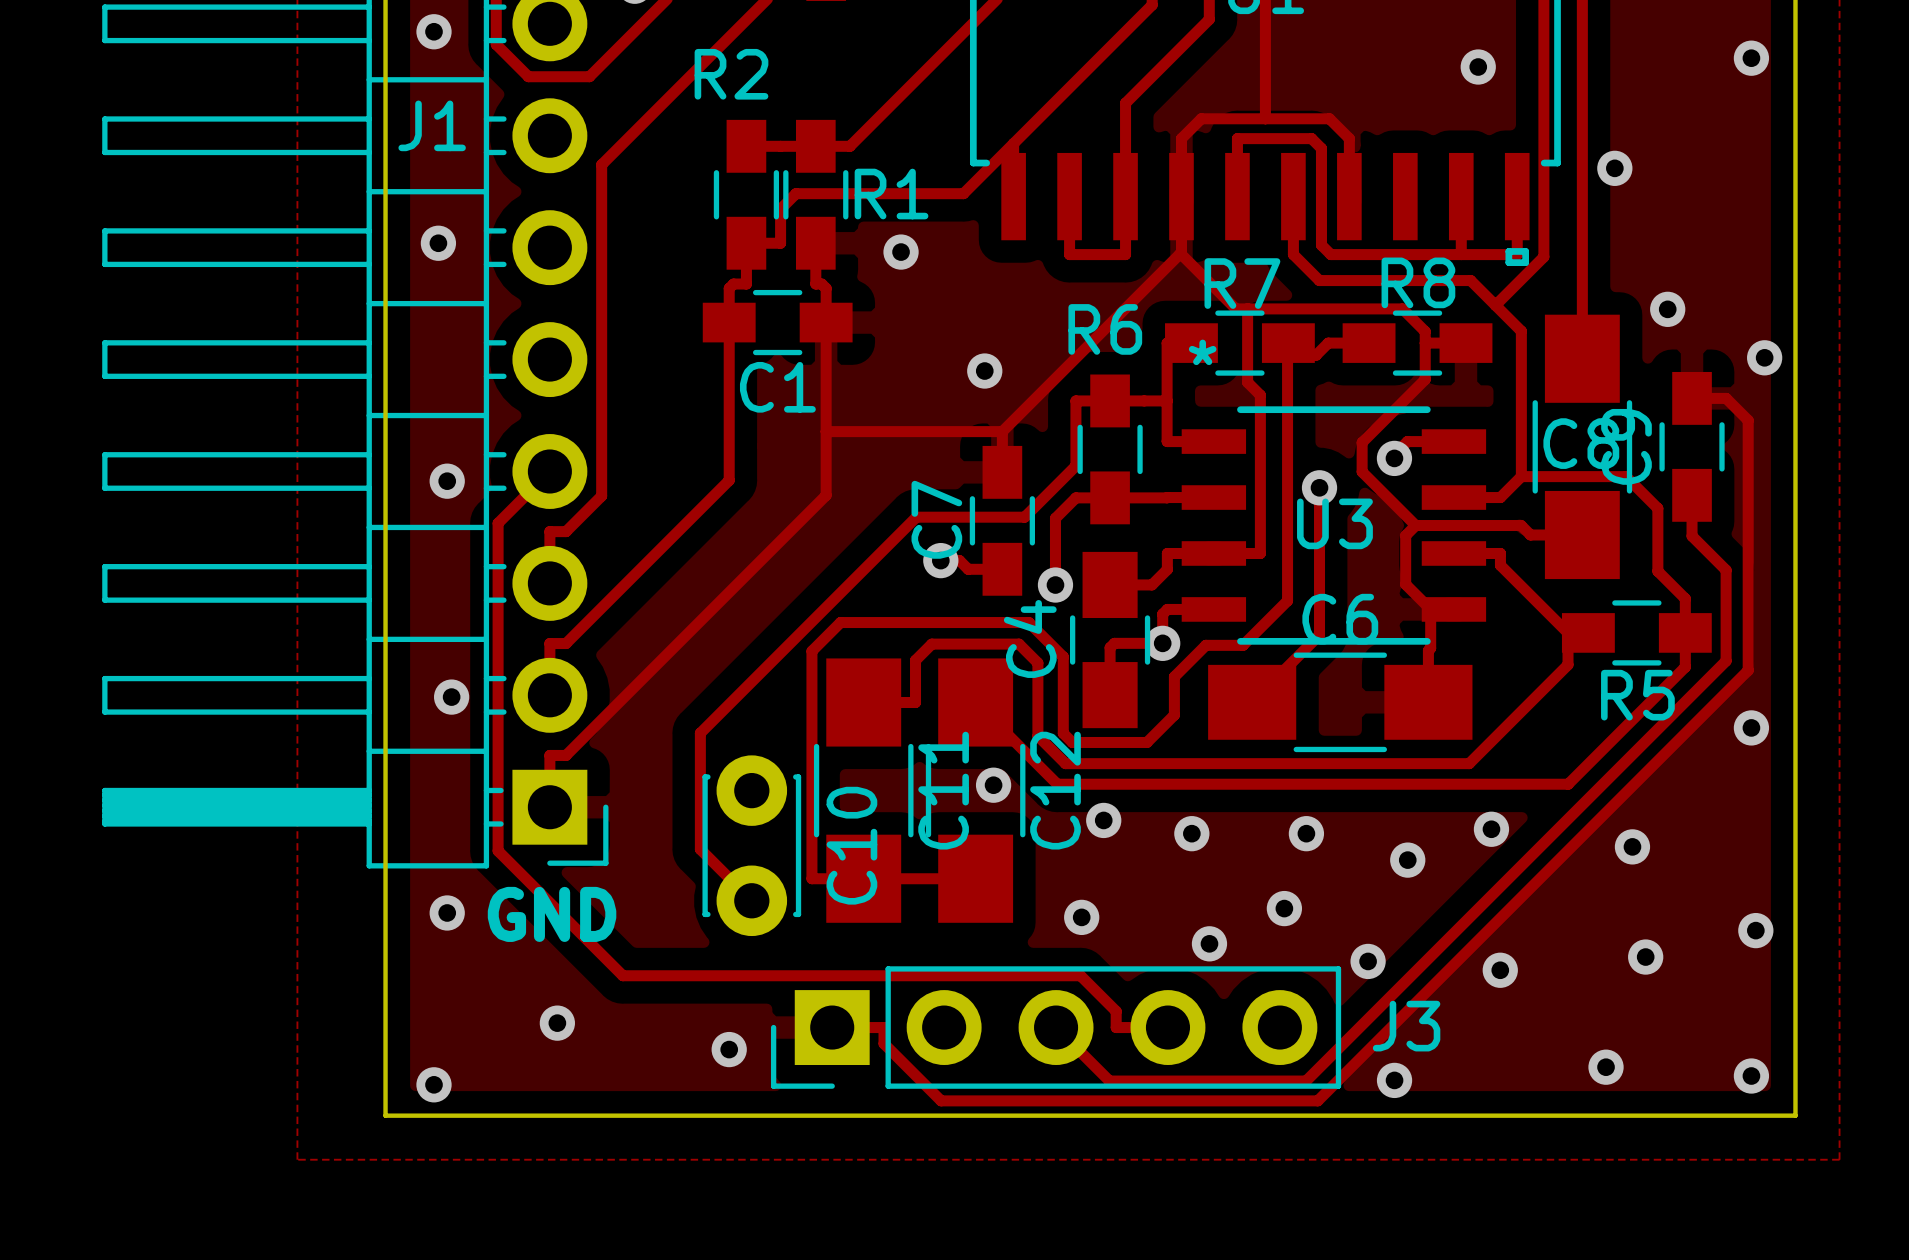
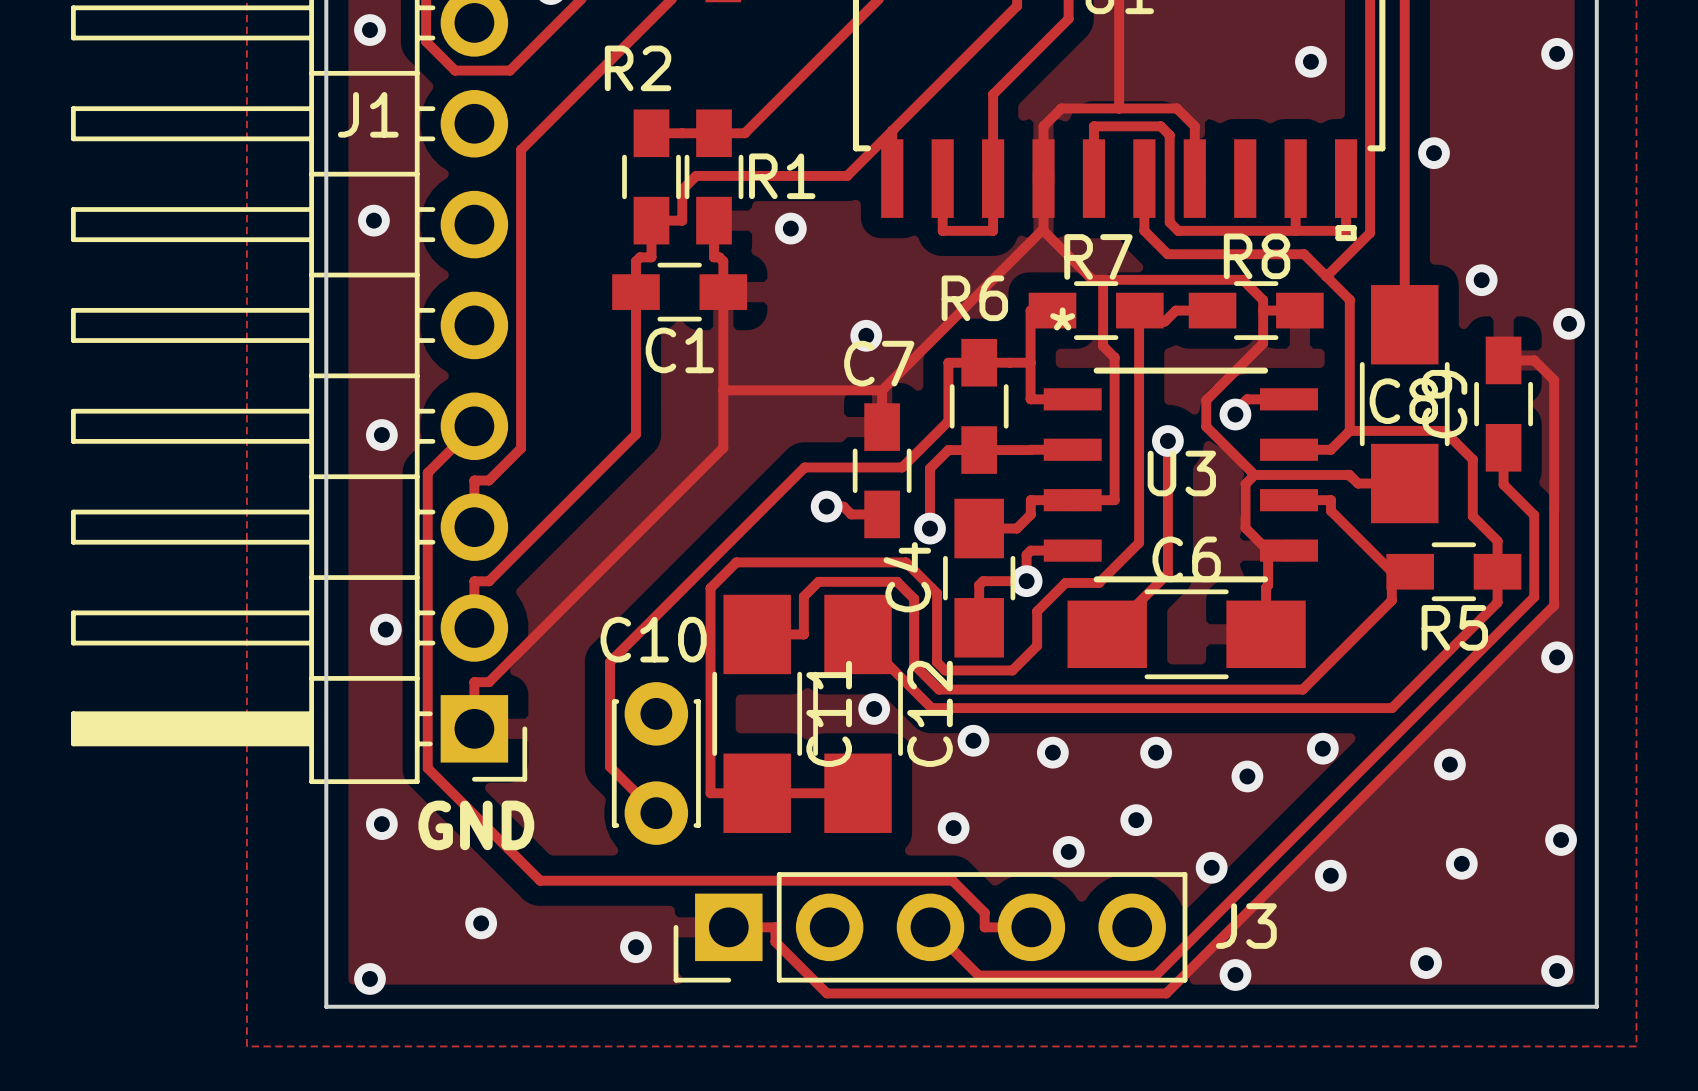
C7 name rotation: 0° (936, 519) -> 90° clockwise (879, 363)
C7 name position: C7 (936, 519) -> C7 (879, 363)
C10 name rotation: 0° (851, 845) -> 90° clockwise (653, 639)
C10 name position: C10 (851, 845) -> C10 (653, 639)

